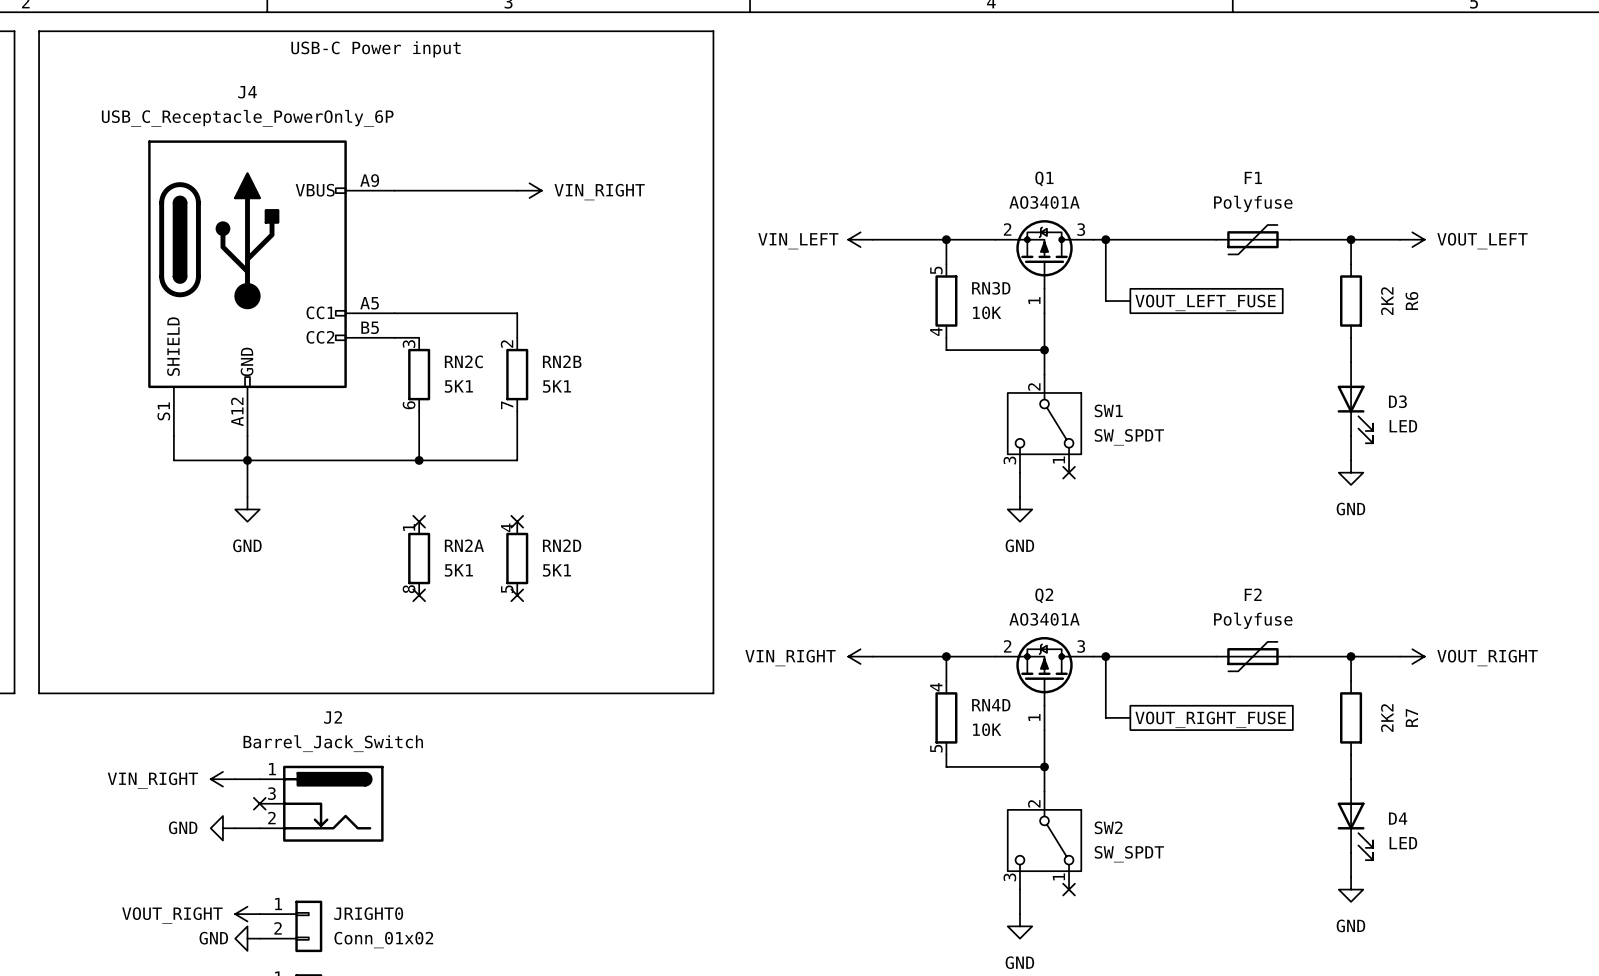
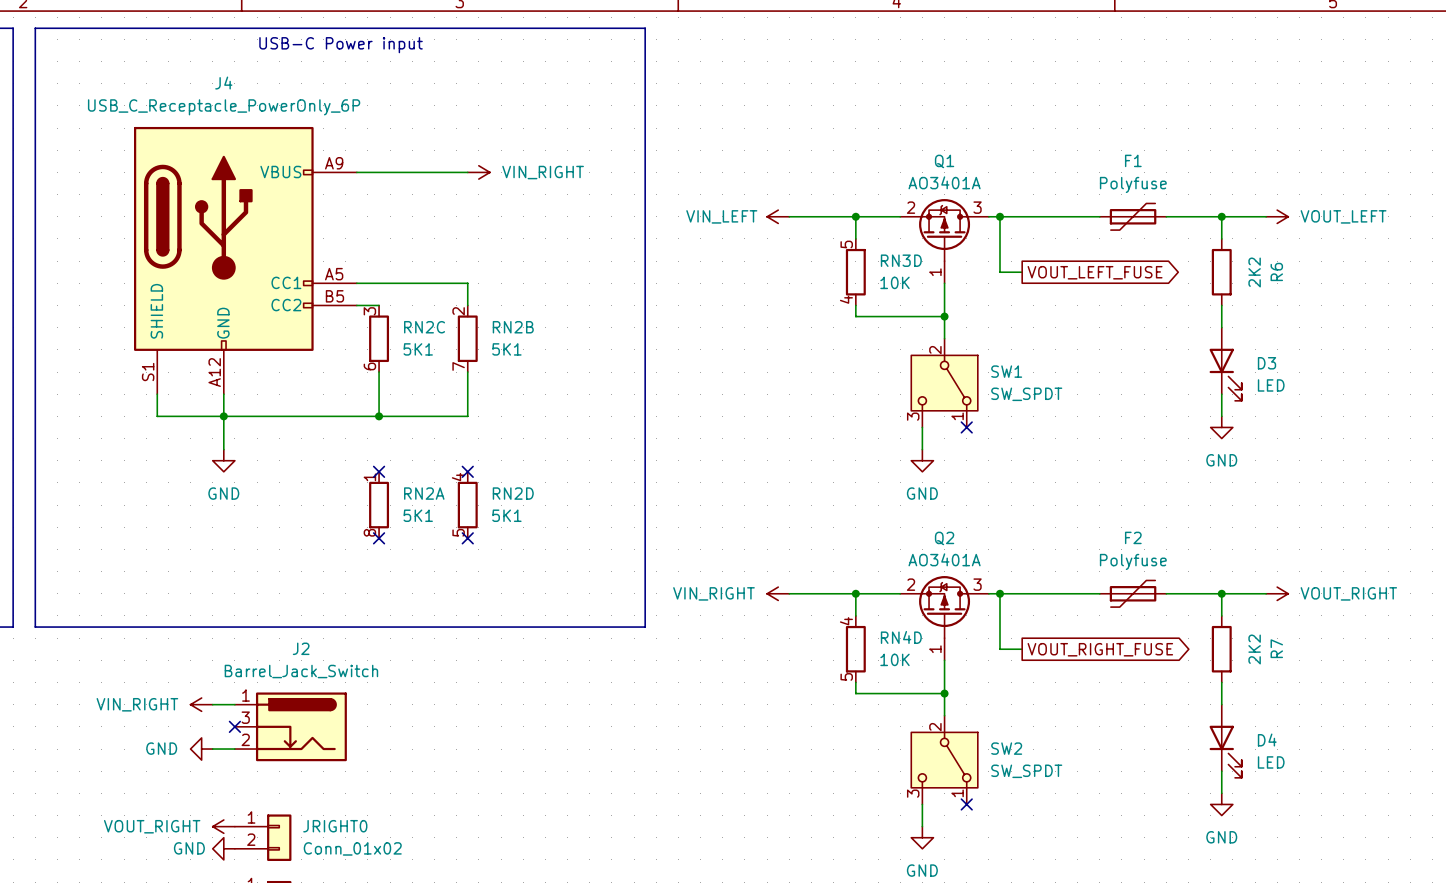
global label shape: passive (1205, 302) -> output (1095, 272)
global label shape: passive (1210, 719) -> output (1100, 649)

